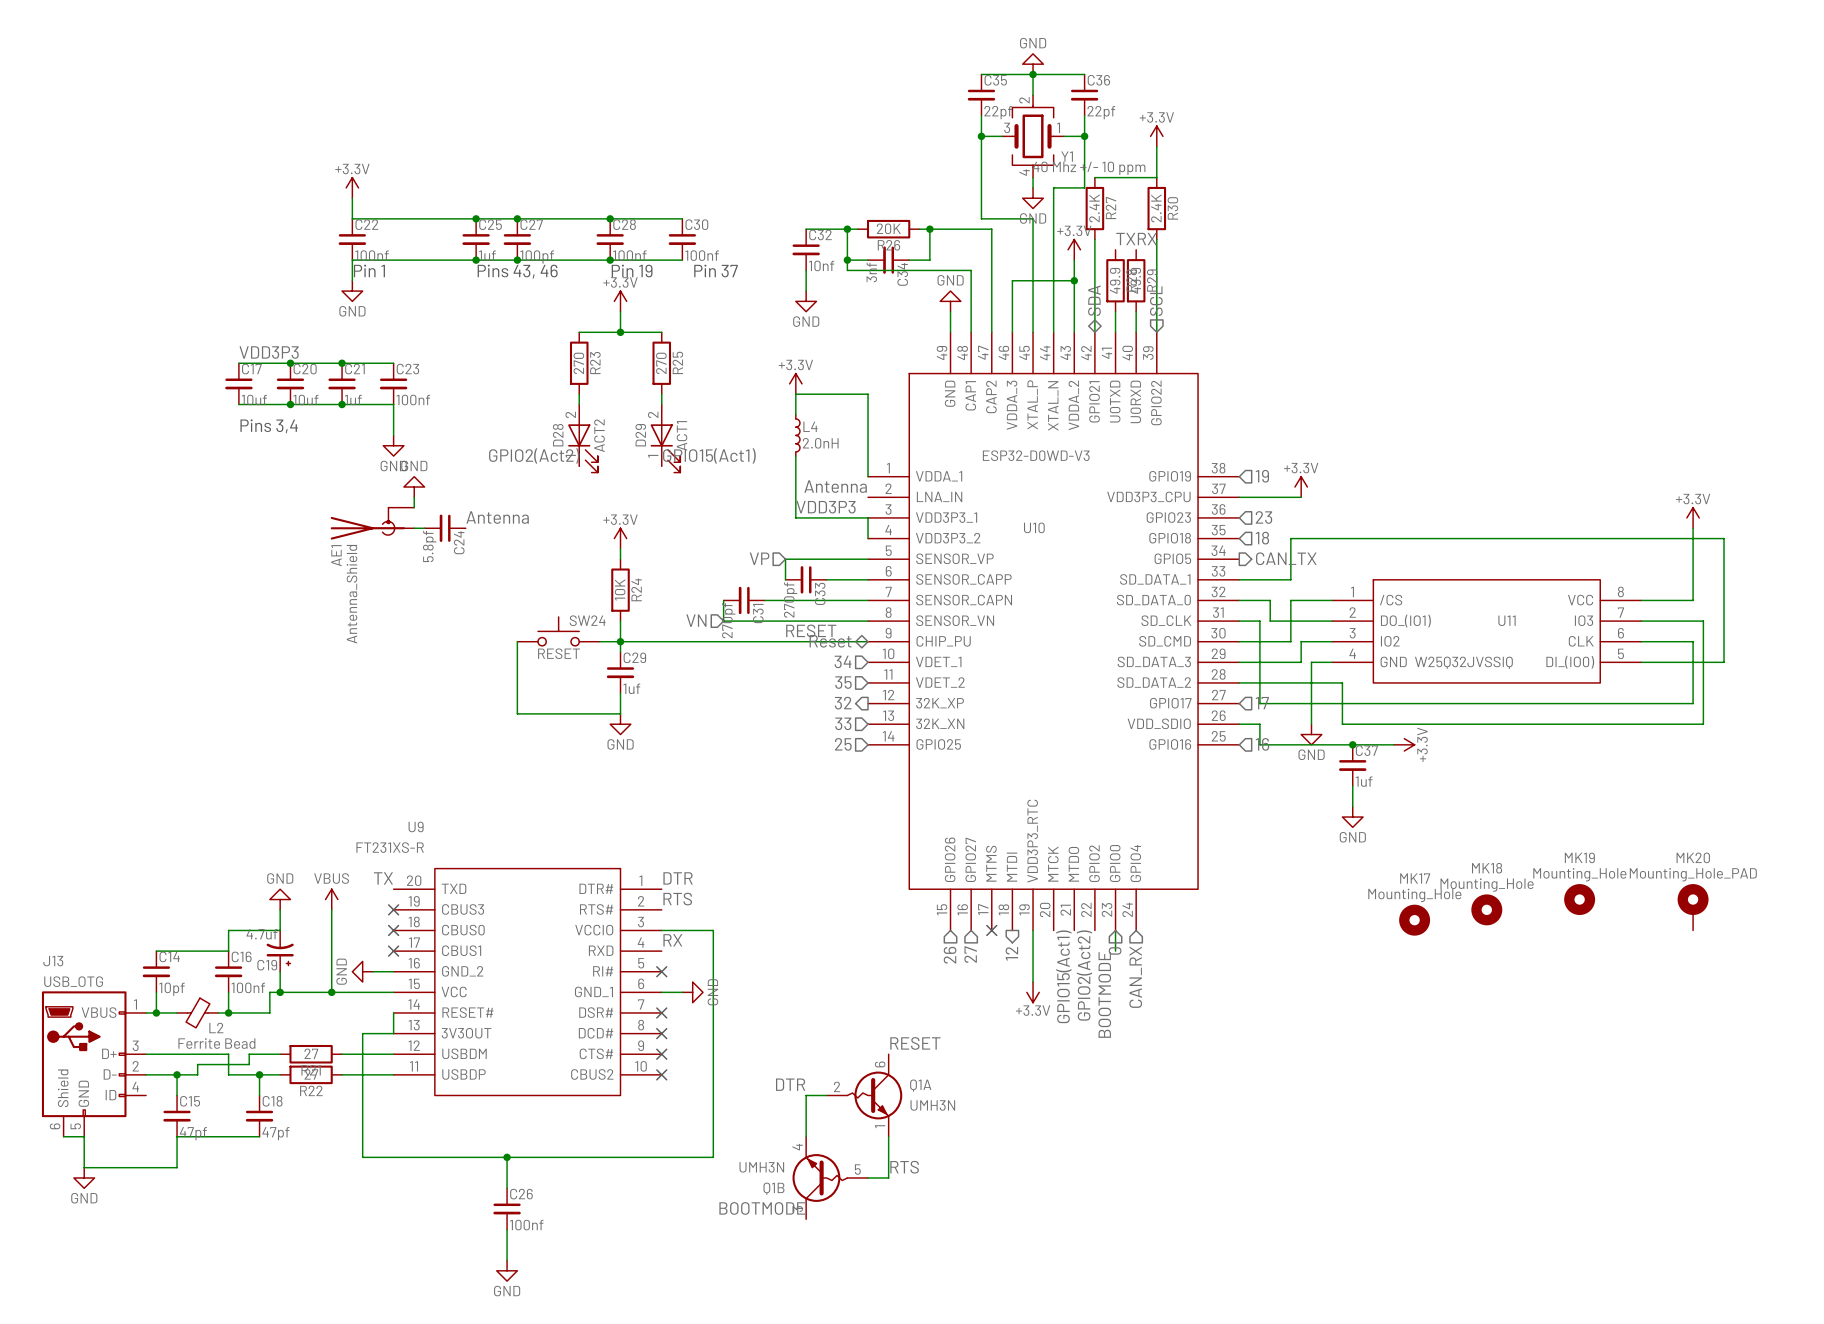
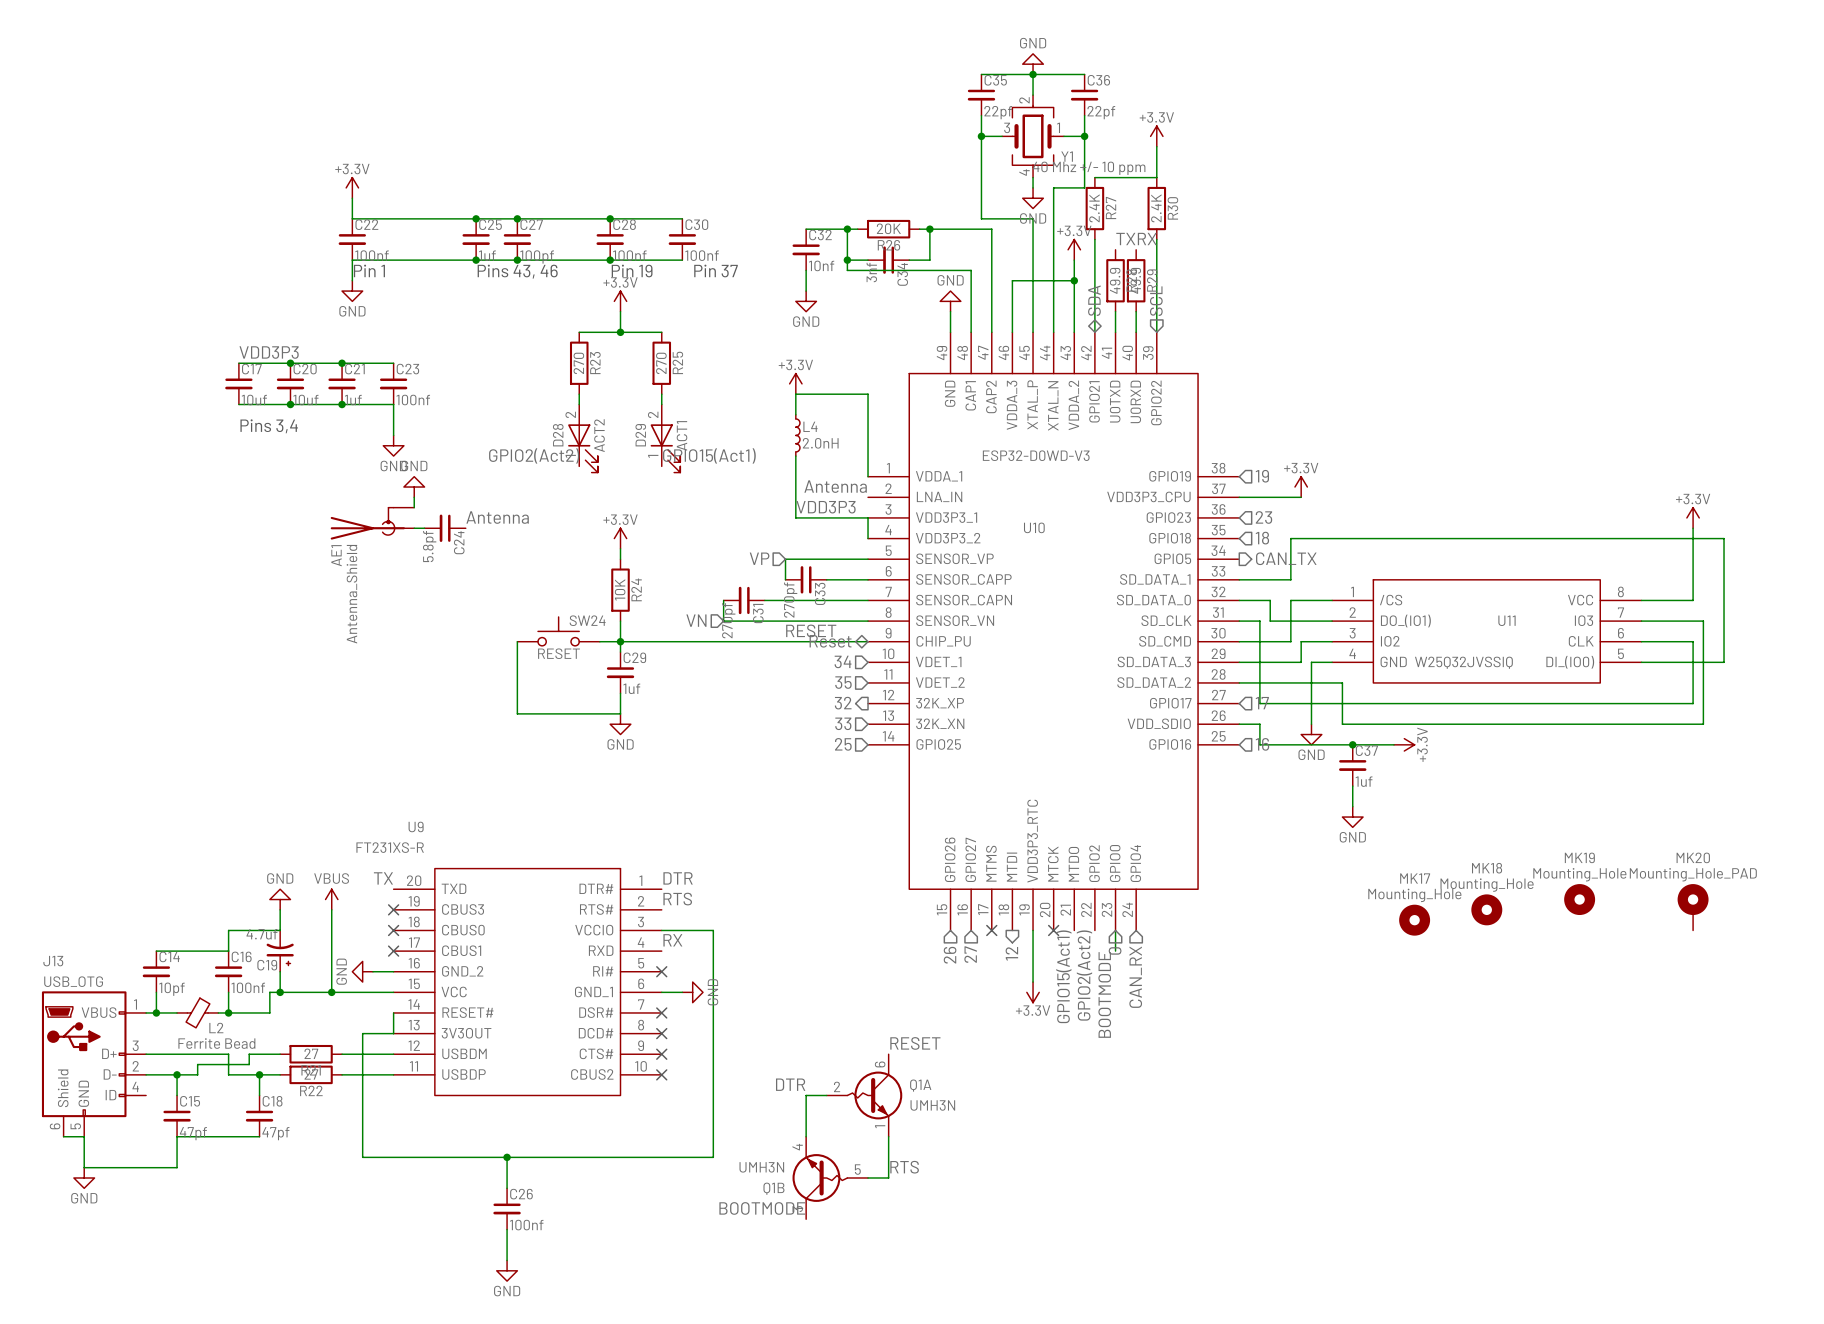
no-connect mark: none -> (1053, 930)

